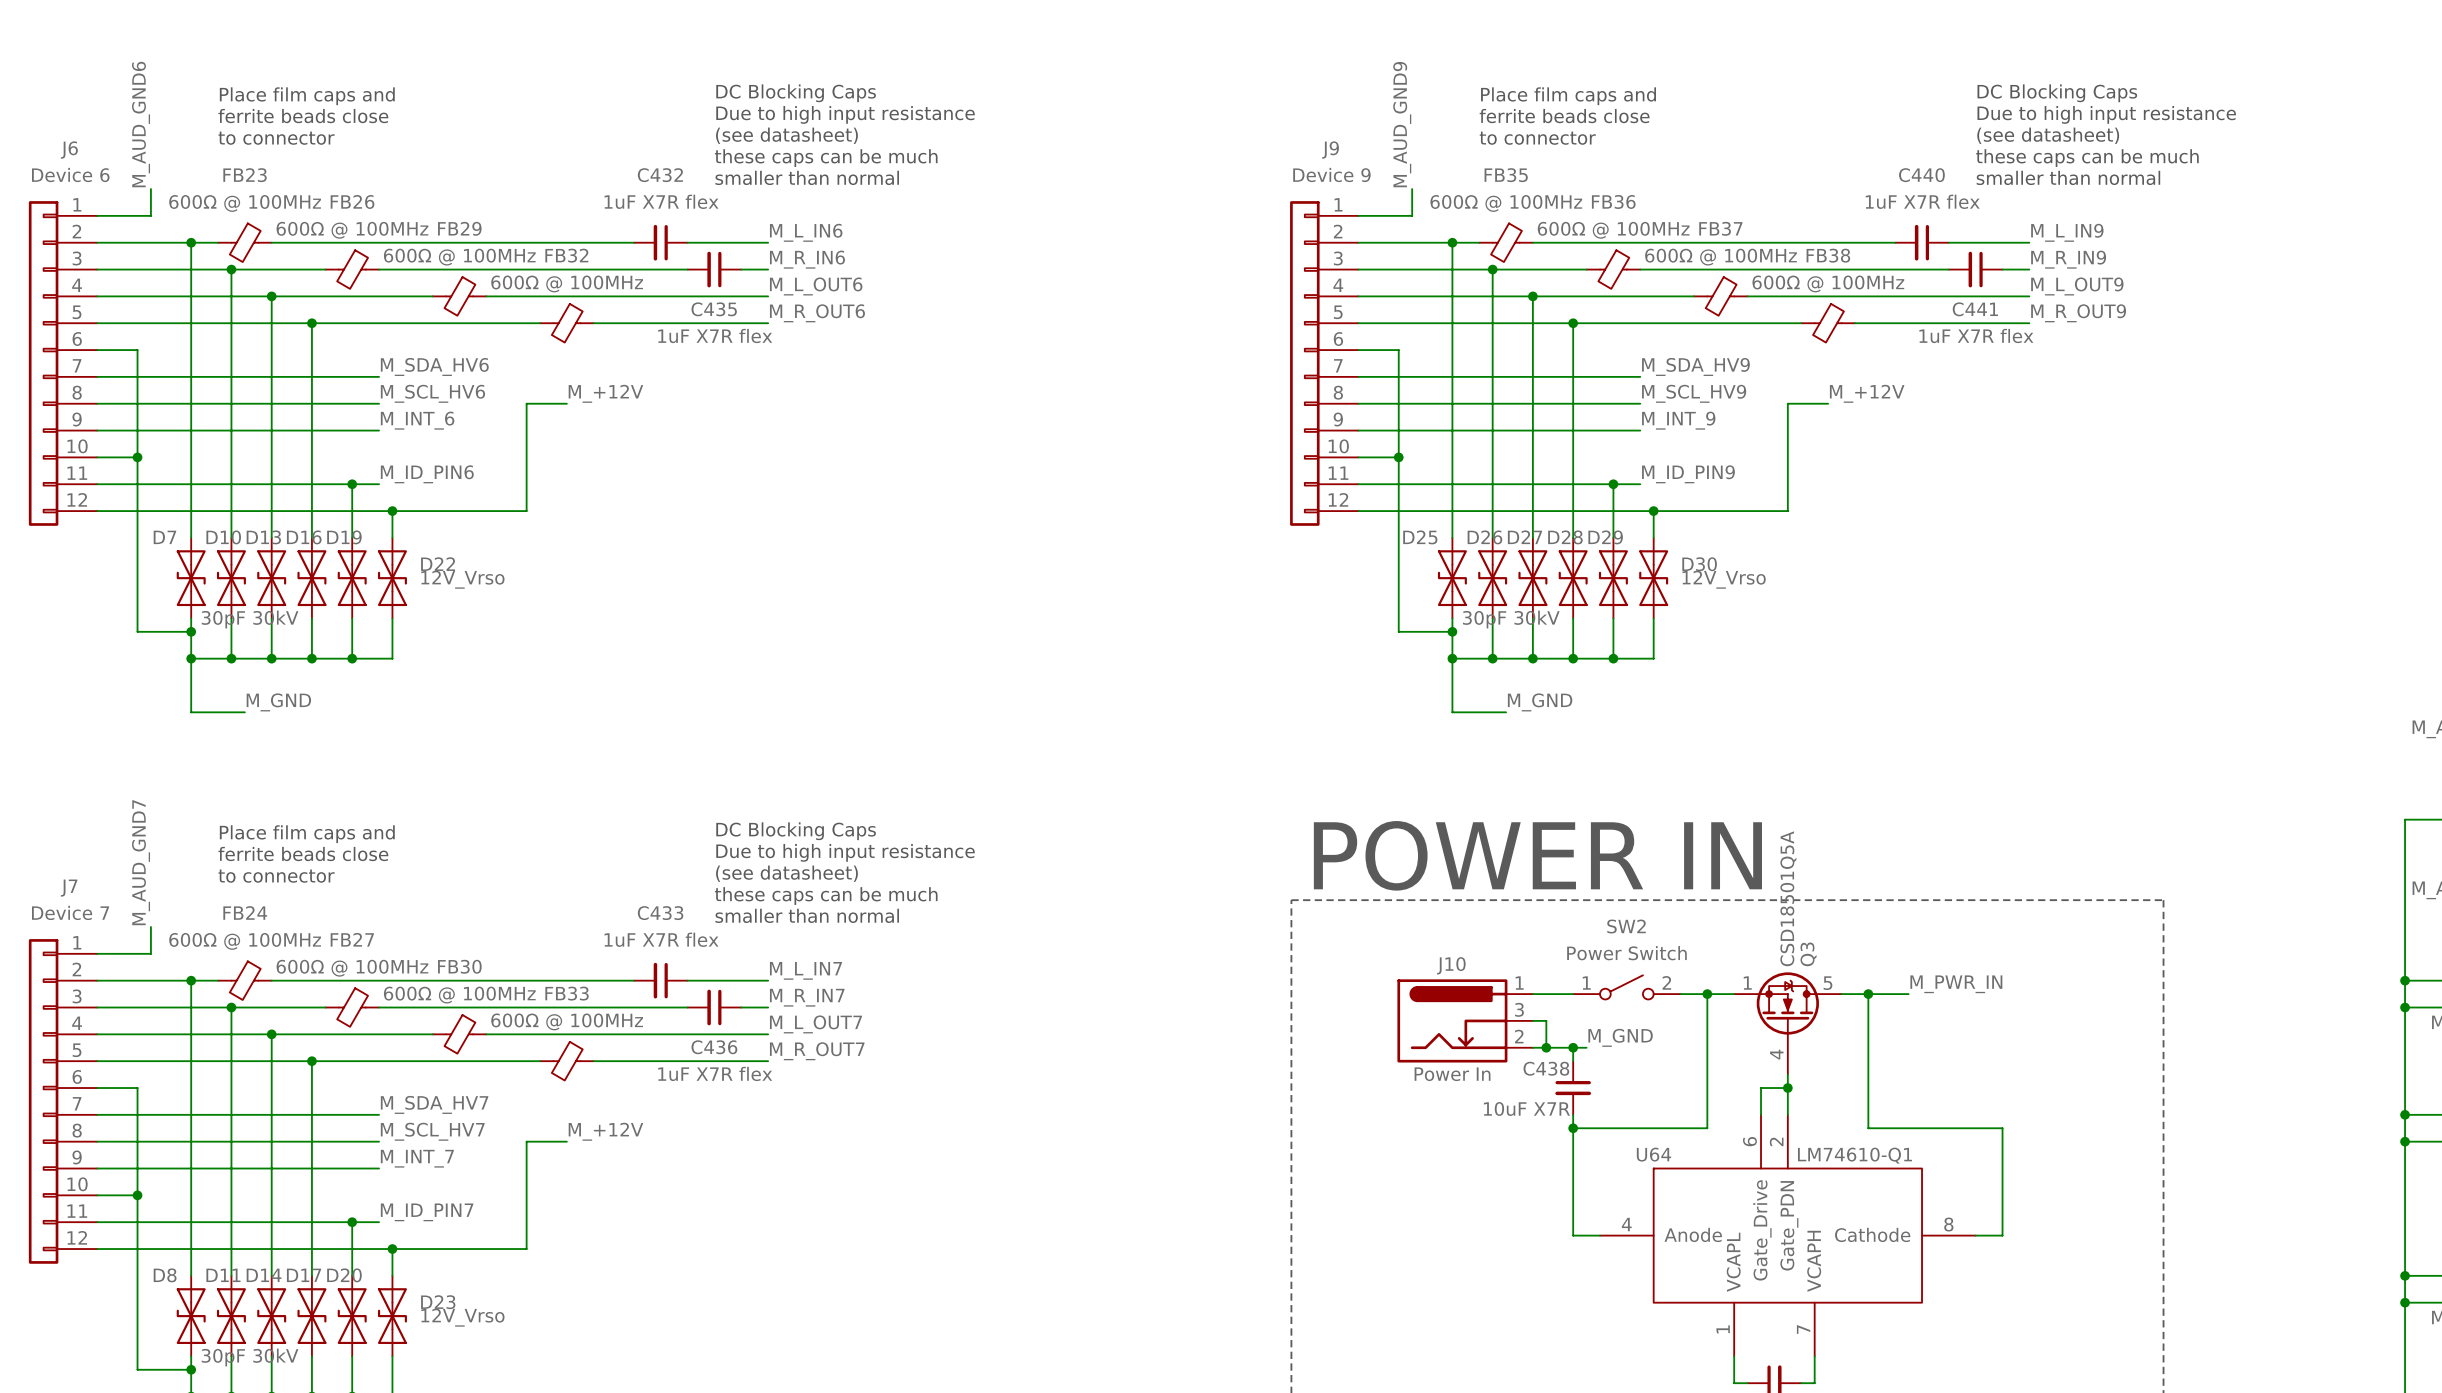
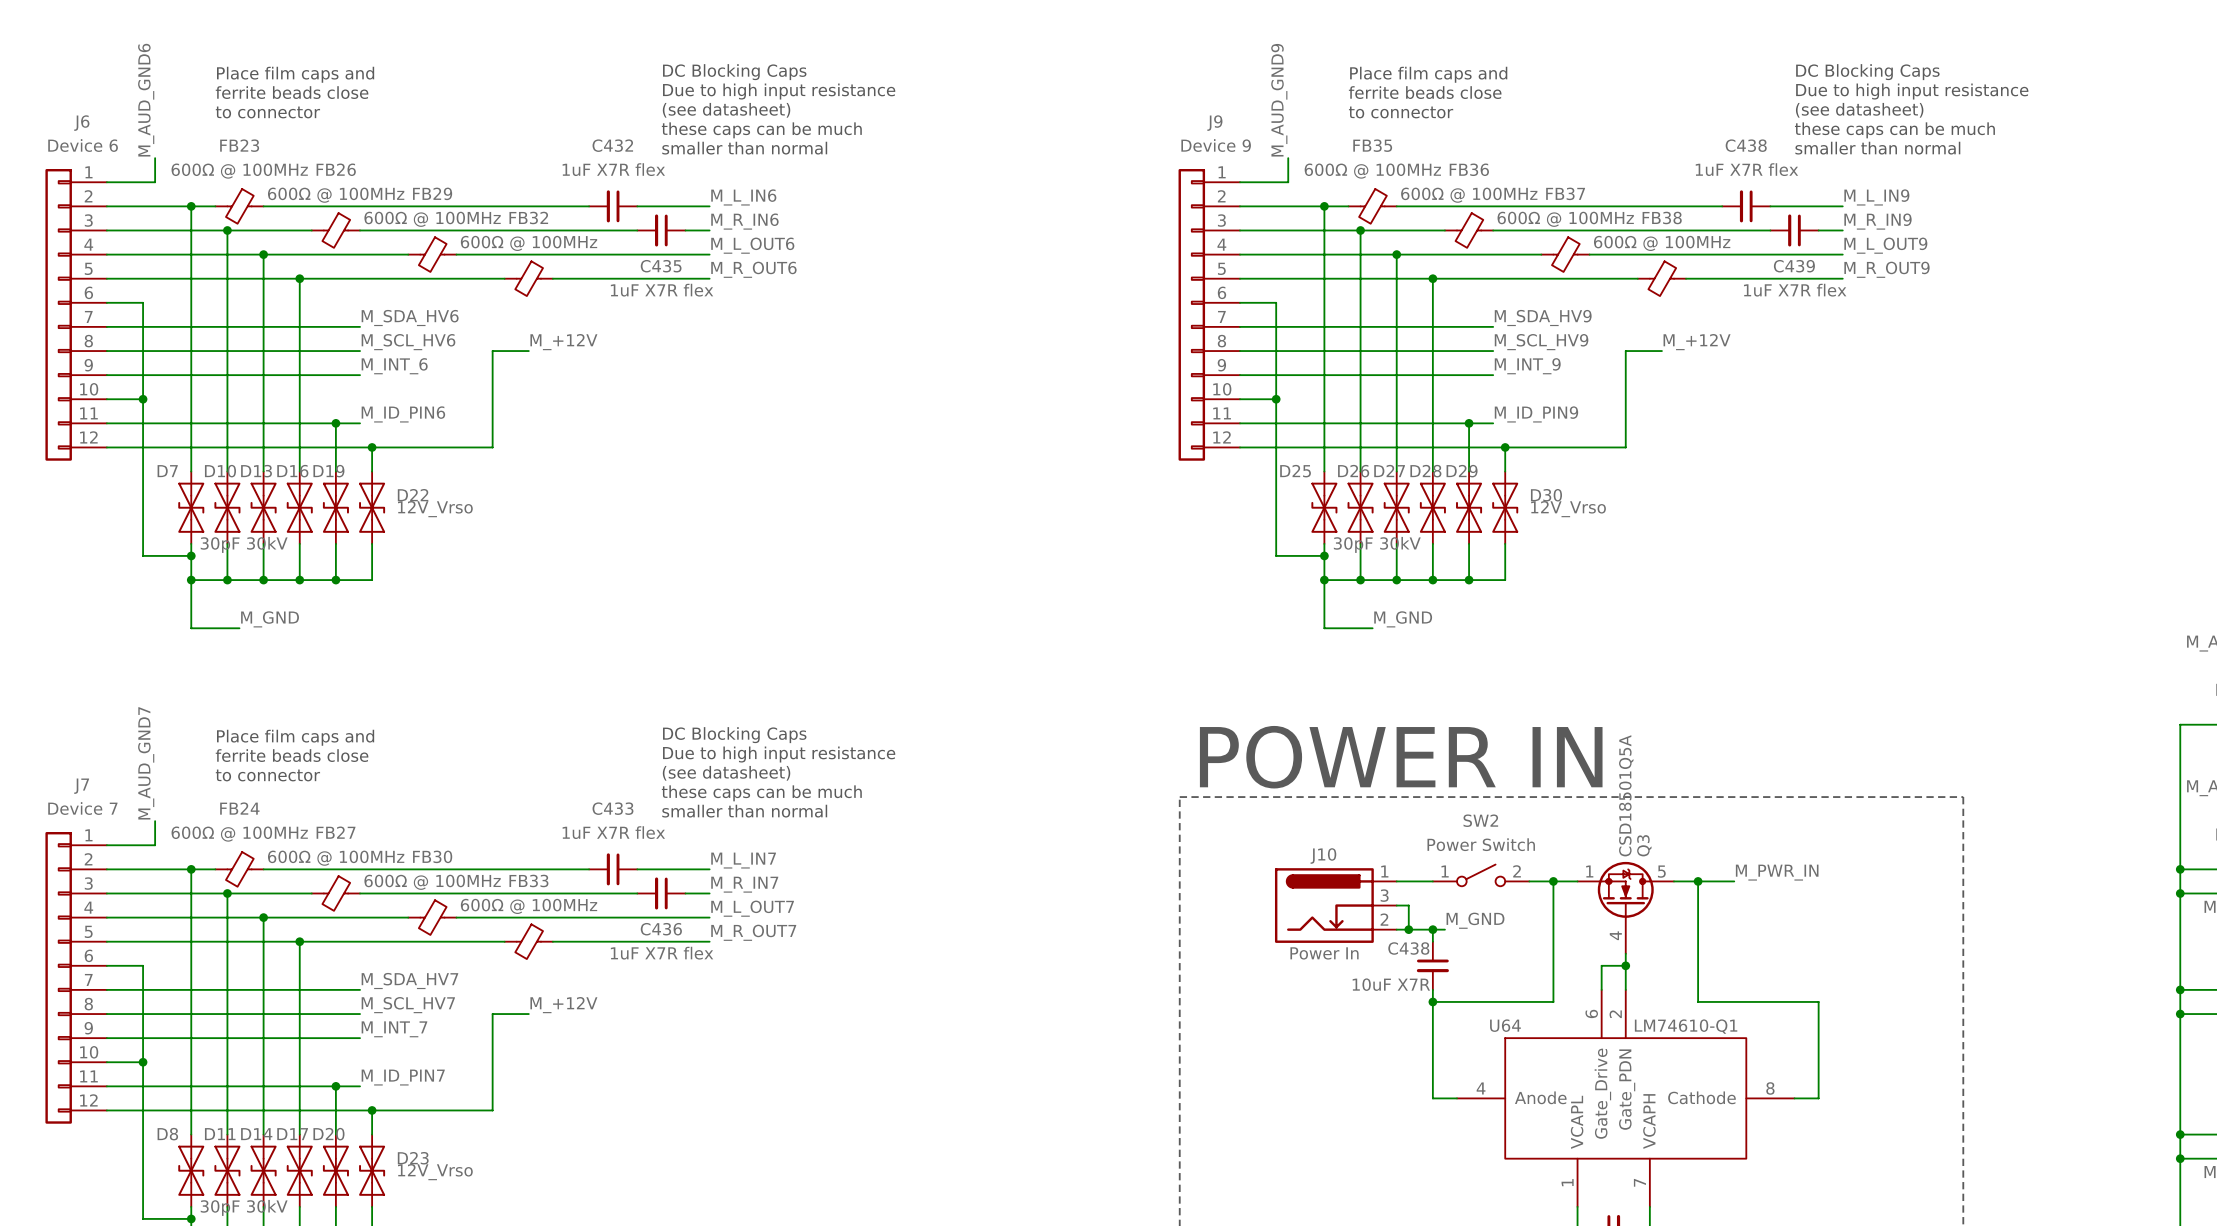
C440 name: C440 (1921, 175) -> C438 (1746, 145)
C441 name: C441 (1975, 309) -> C439 (1794, 266)

